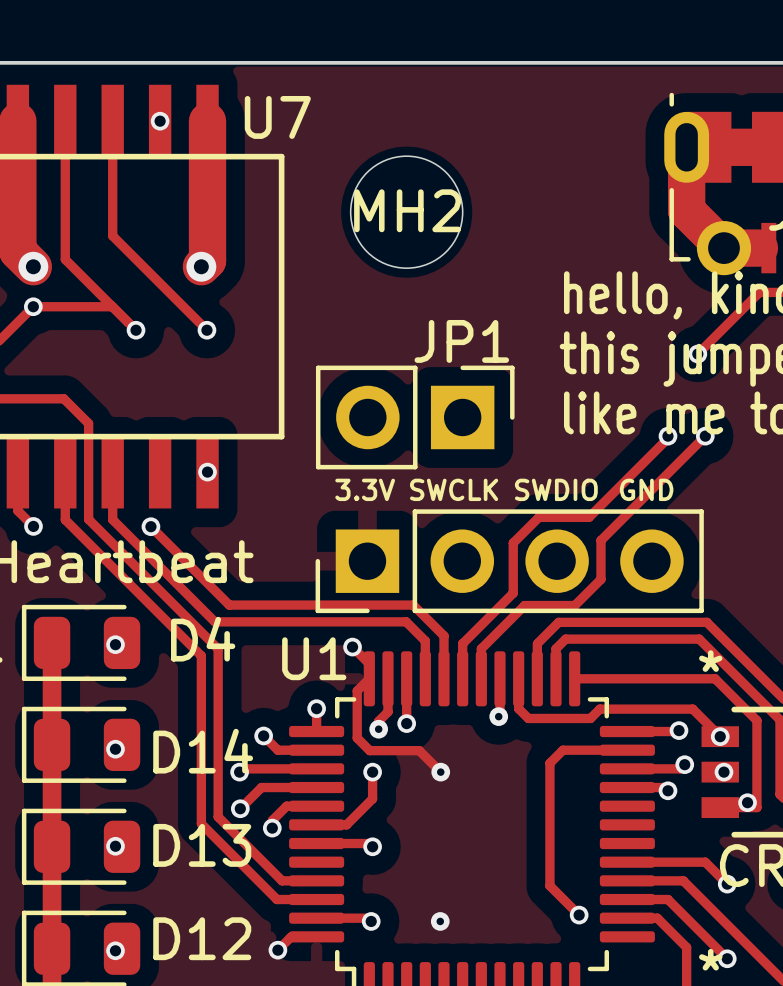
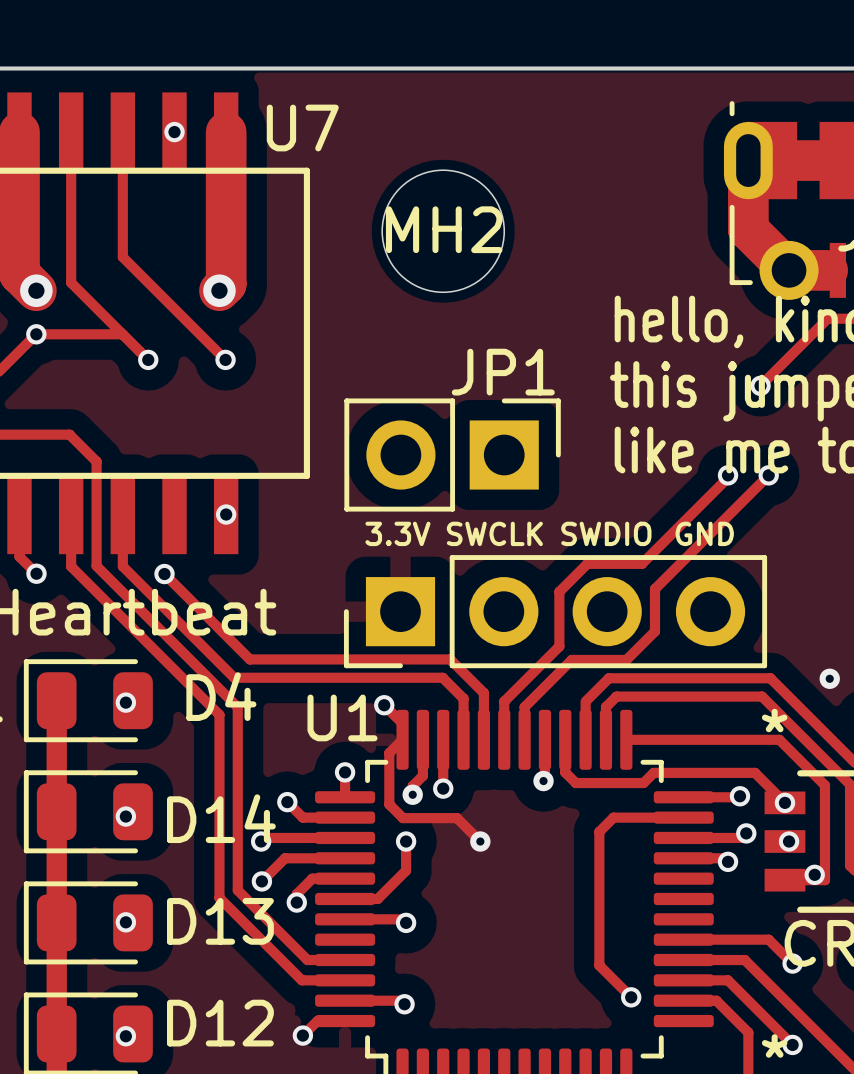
via: none -> (829, 678)
via: (440, 921) -> none

